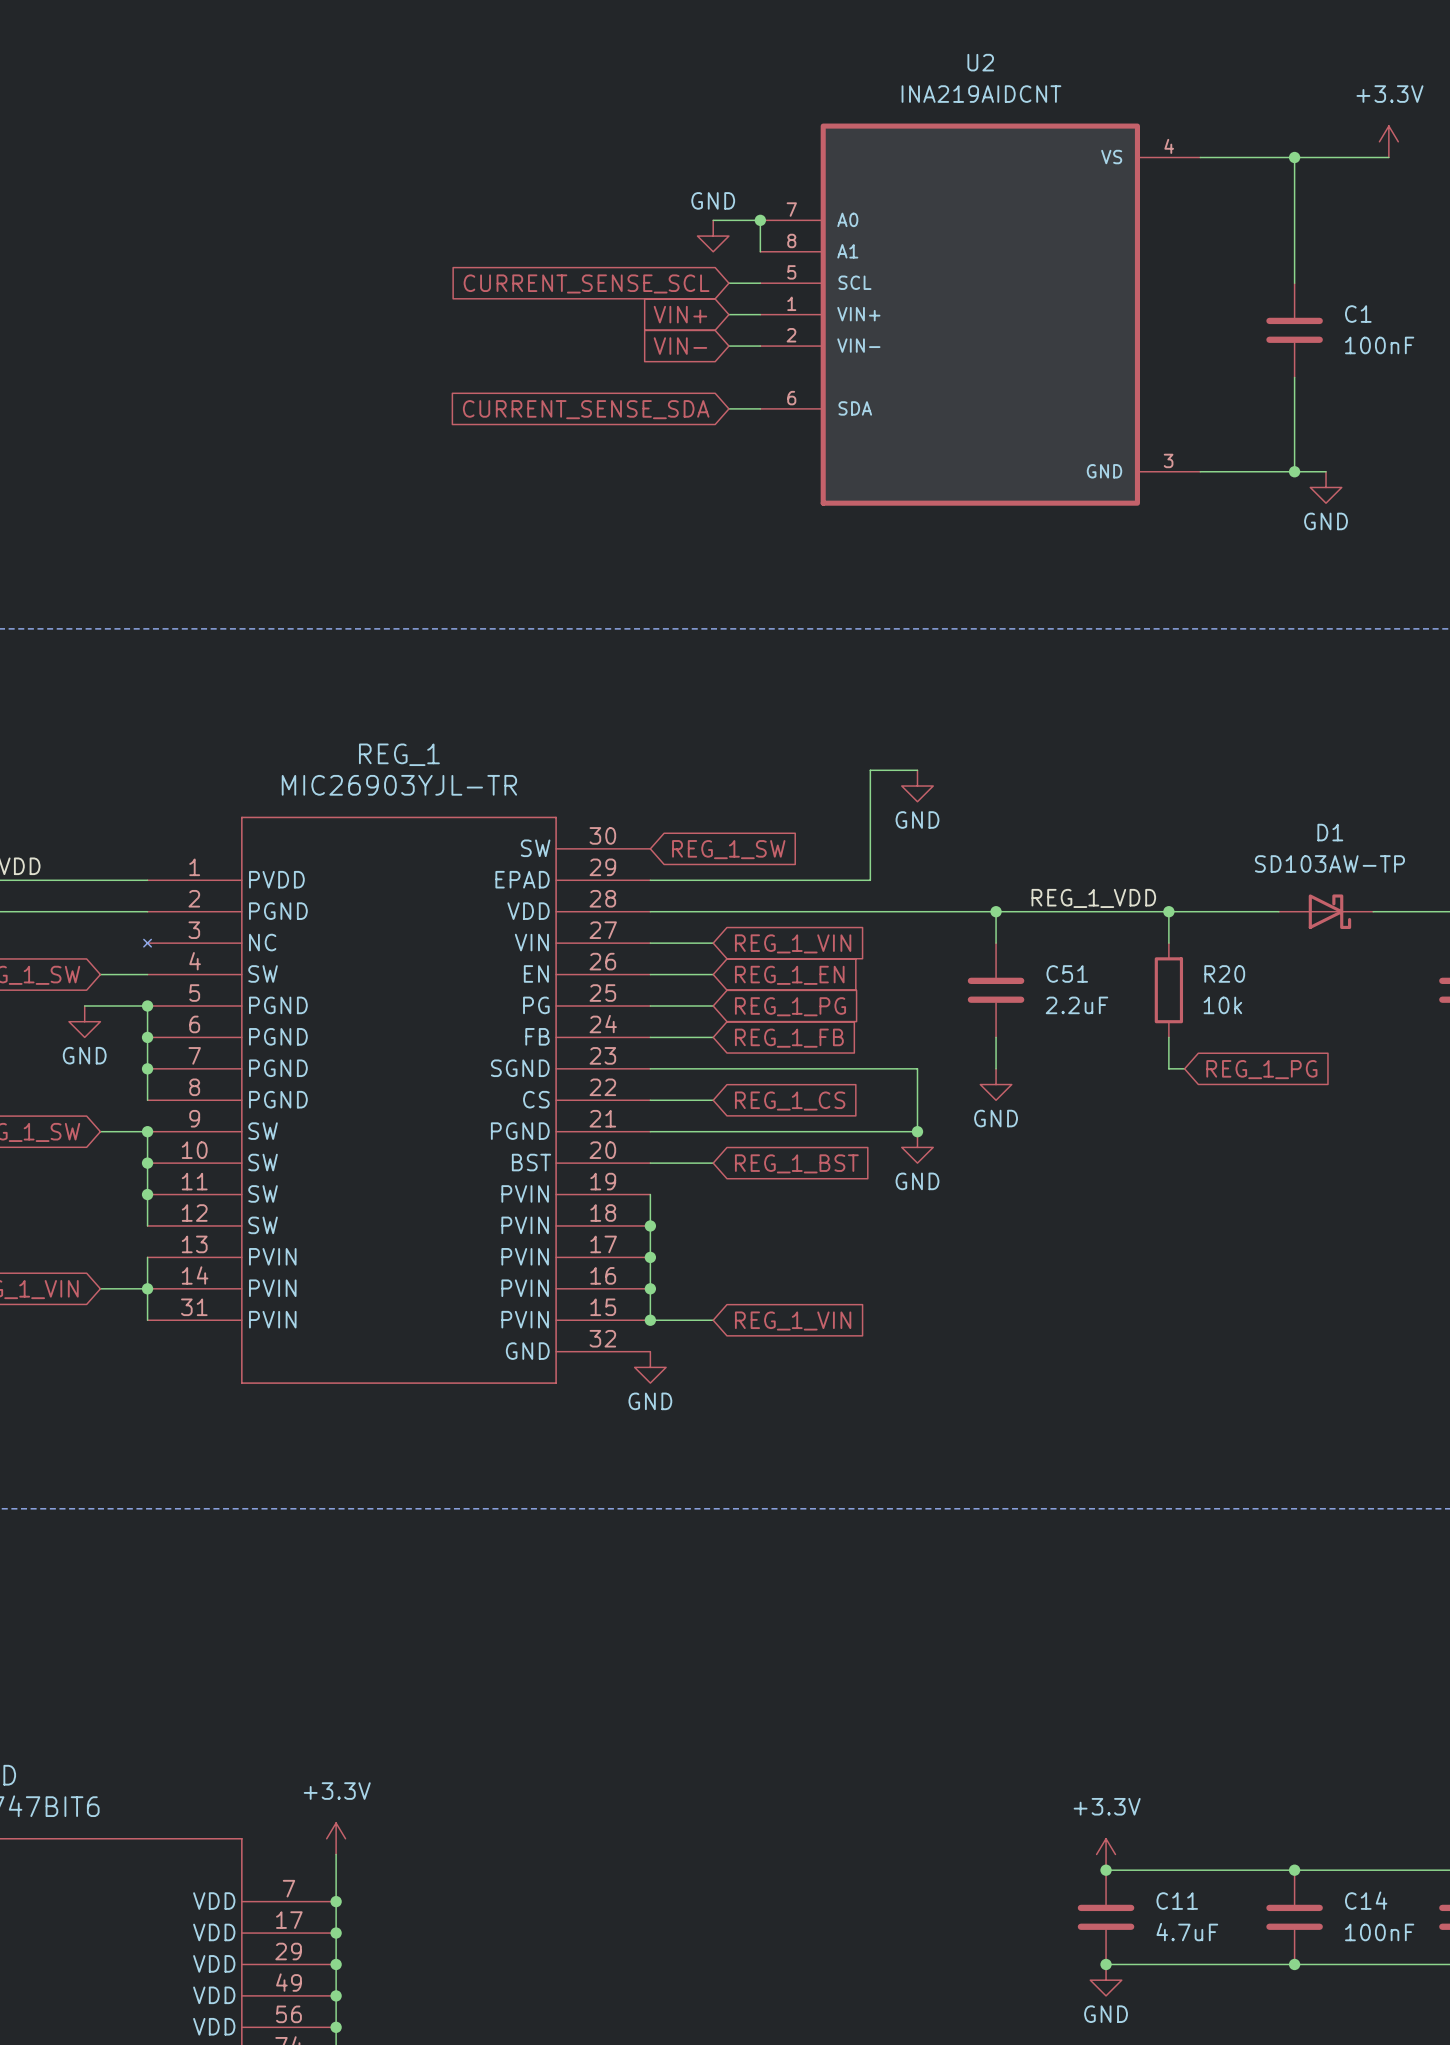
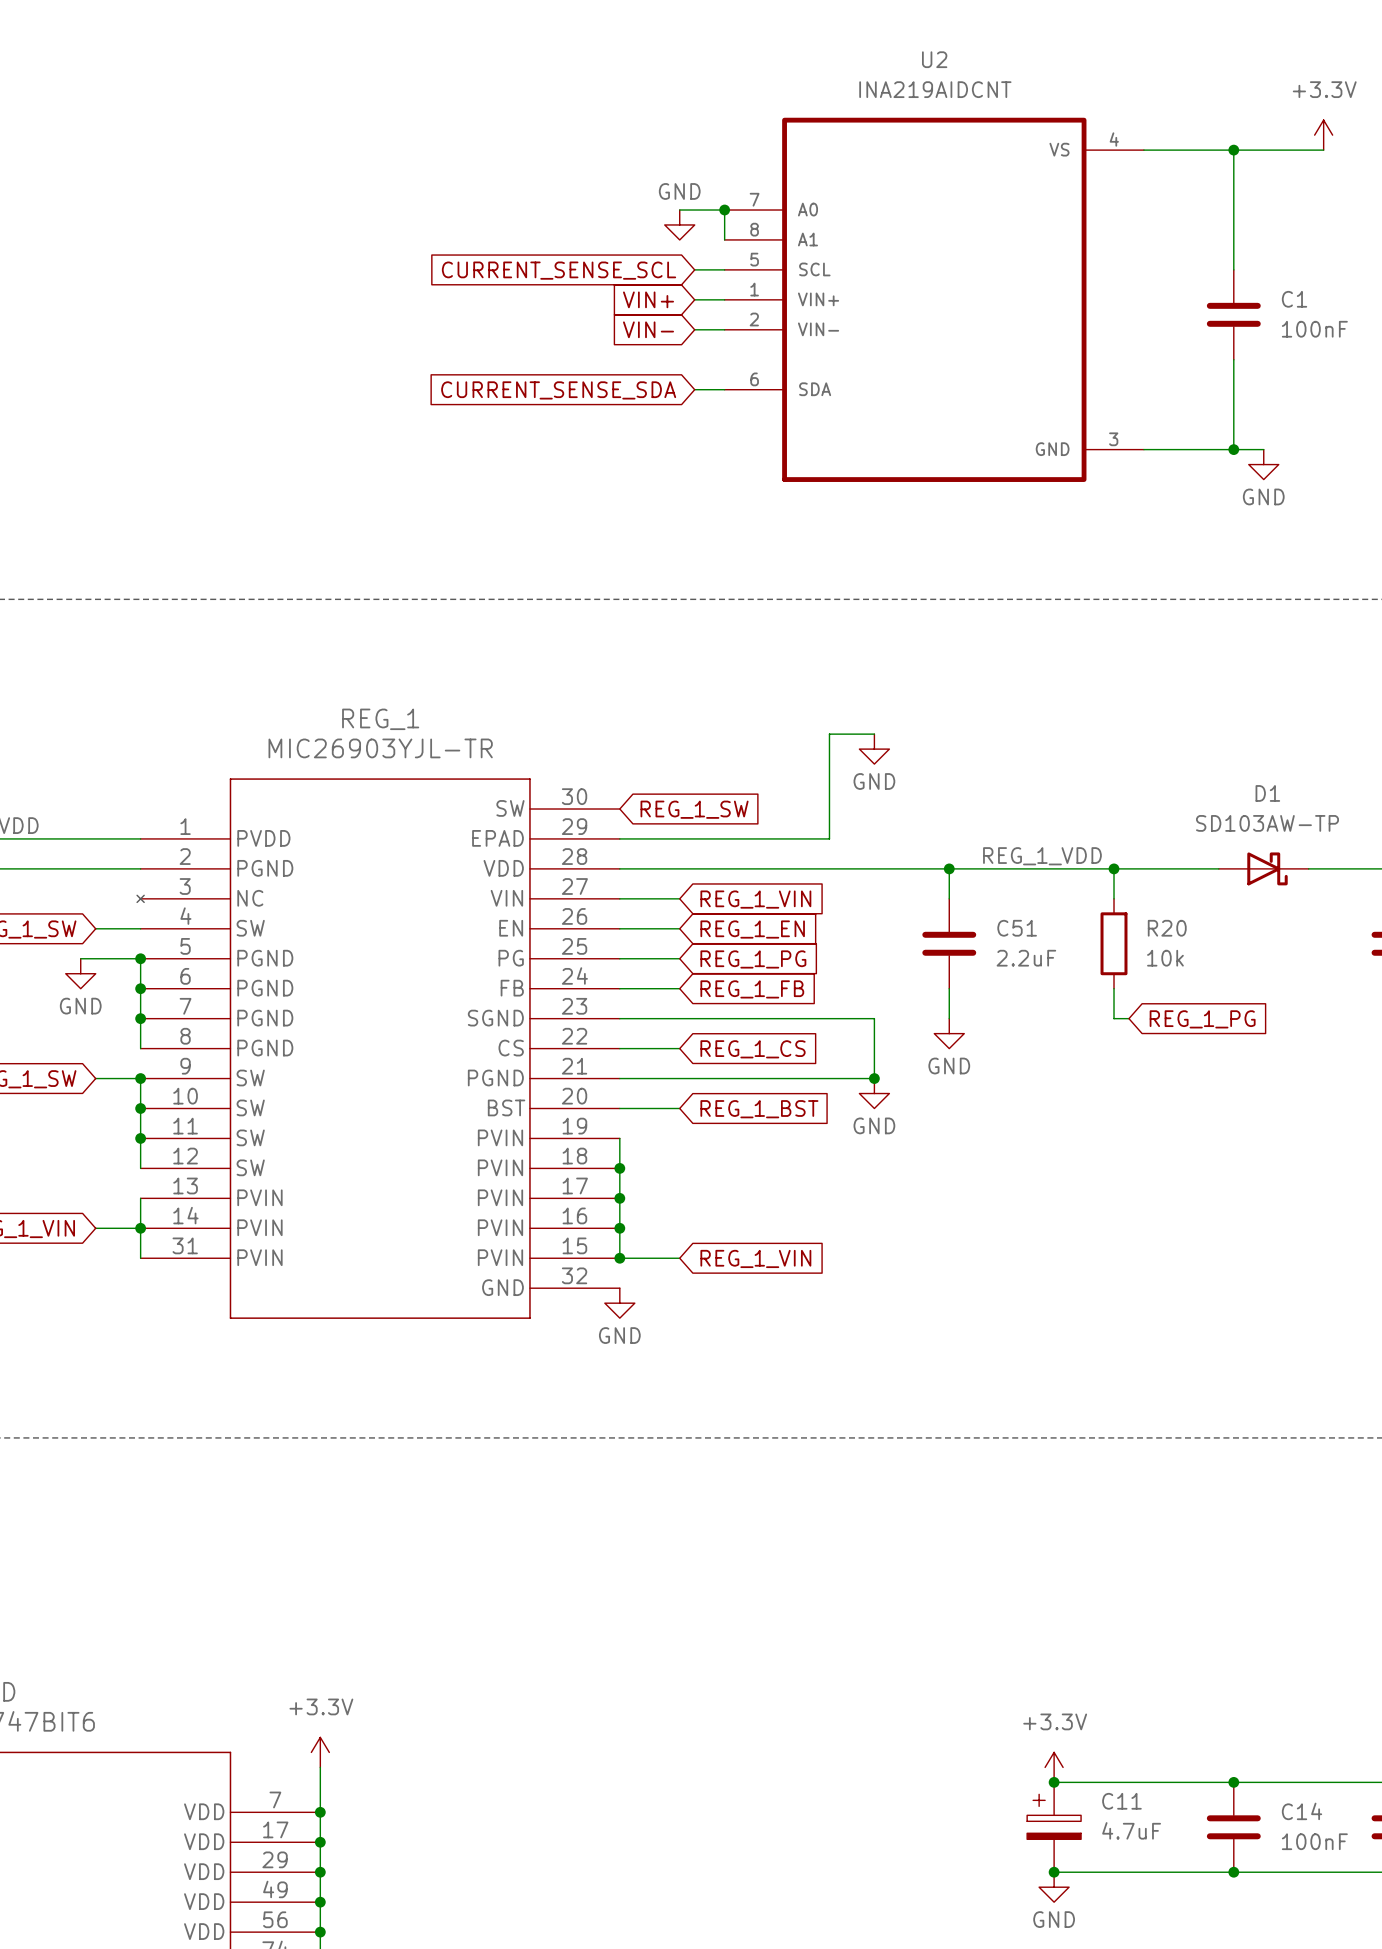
C11 symbol: [1077, 1870, 1135, 1965] -> [1027, 1782, 1082, 1873]

